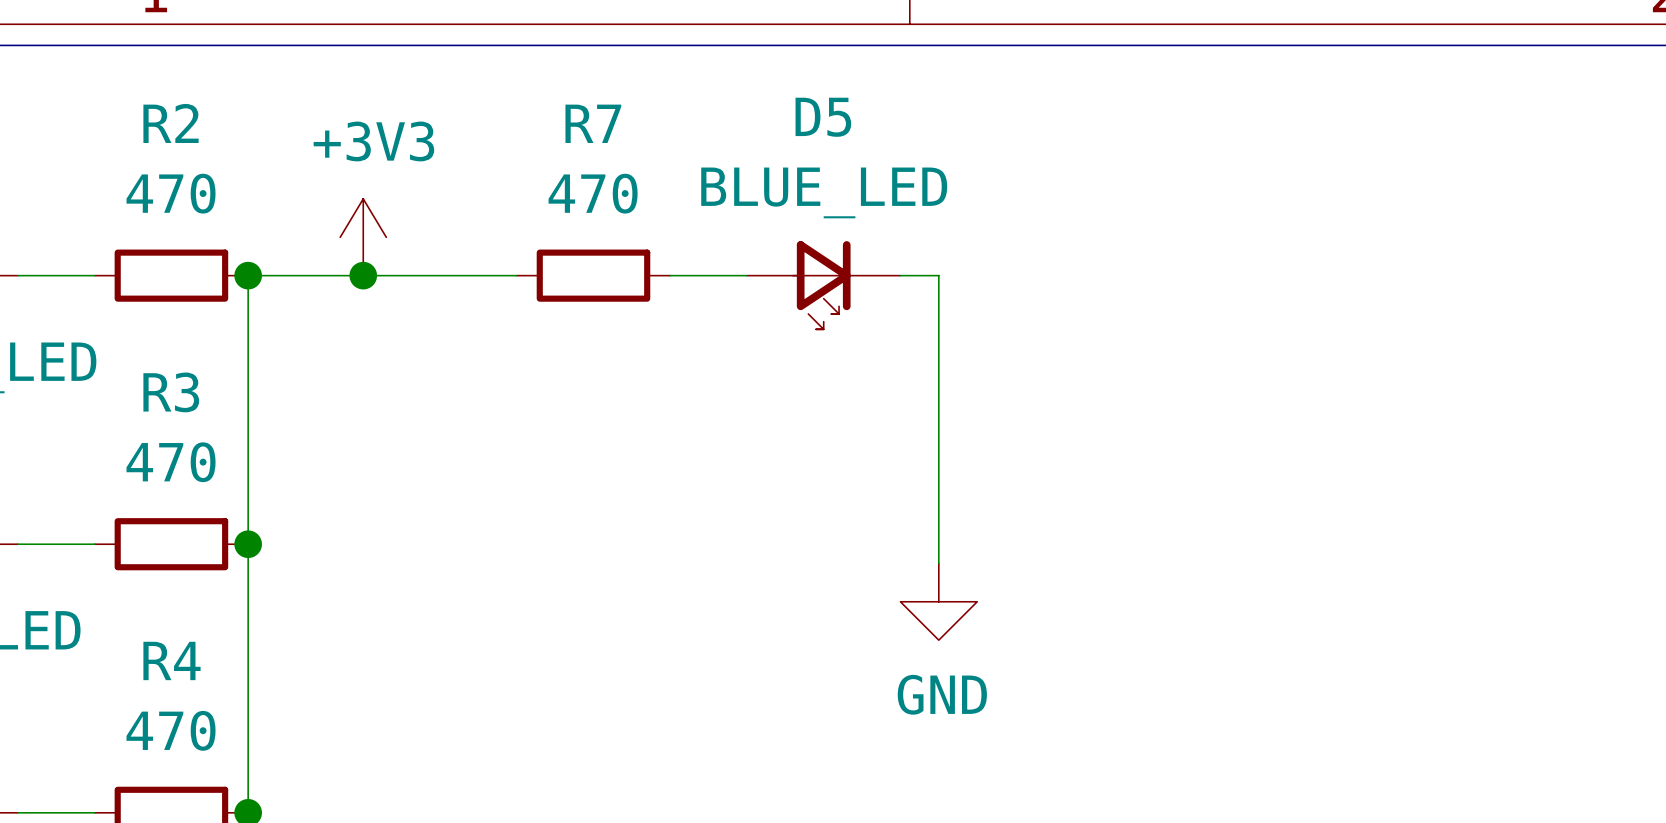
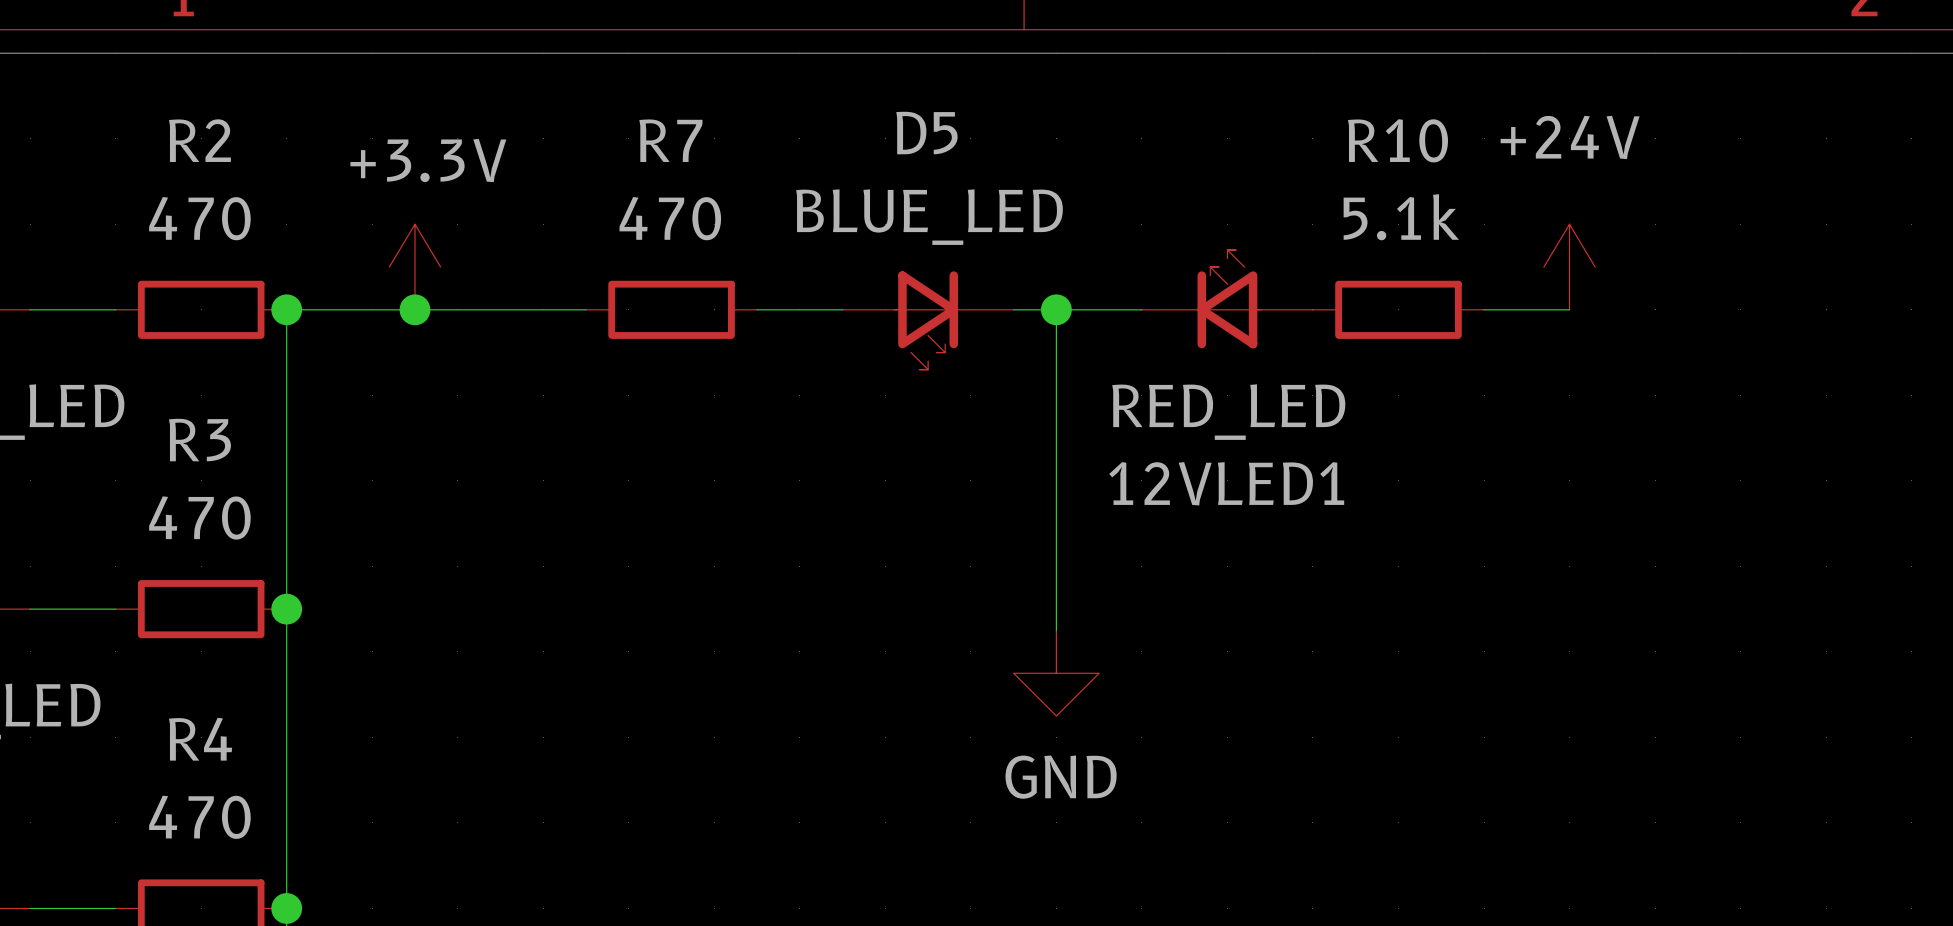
power symbol: +3V3 (363, 237) -> +3.3V (414, 267)
power symbol: none -> +24V (1569, 267)
12VLED1: none -> RED_LED (1227, 299)
wire: none -> (1056, 309) (1141, 309)
junction: none -> (1056, 309)
R10: none -> 5.1k (1398, 309)
wire: none -> (1484, 309) (1569, 309)

